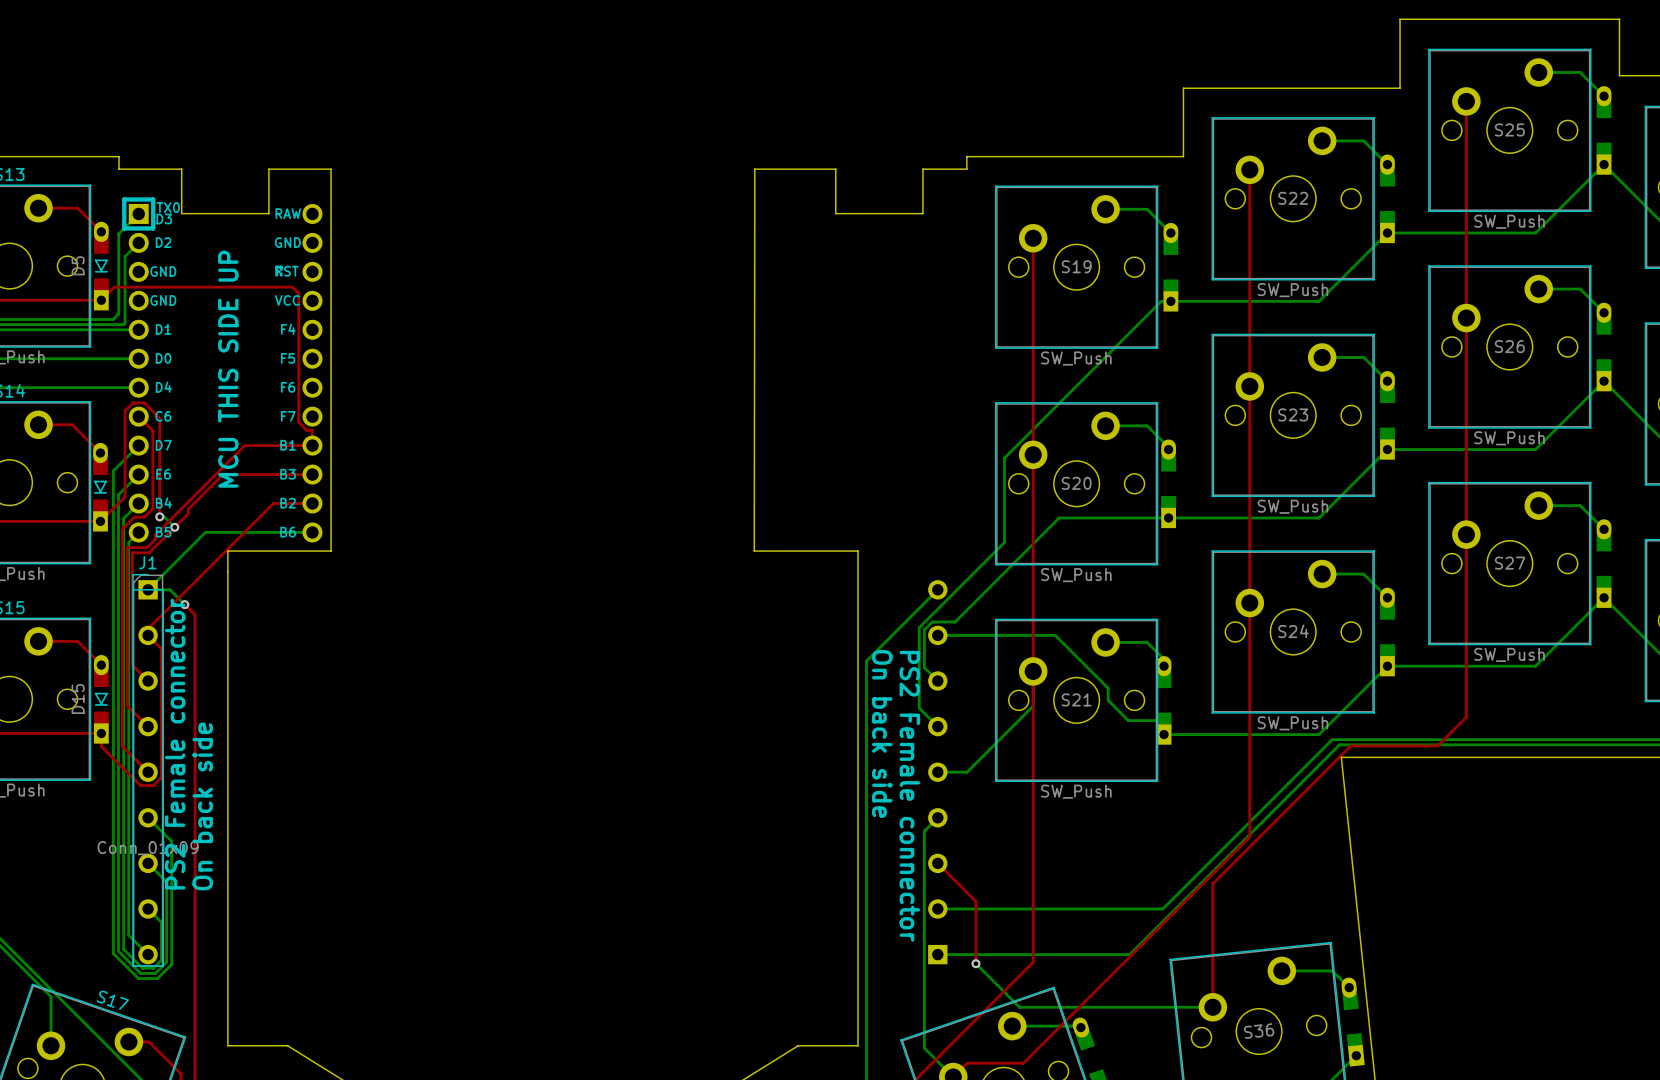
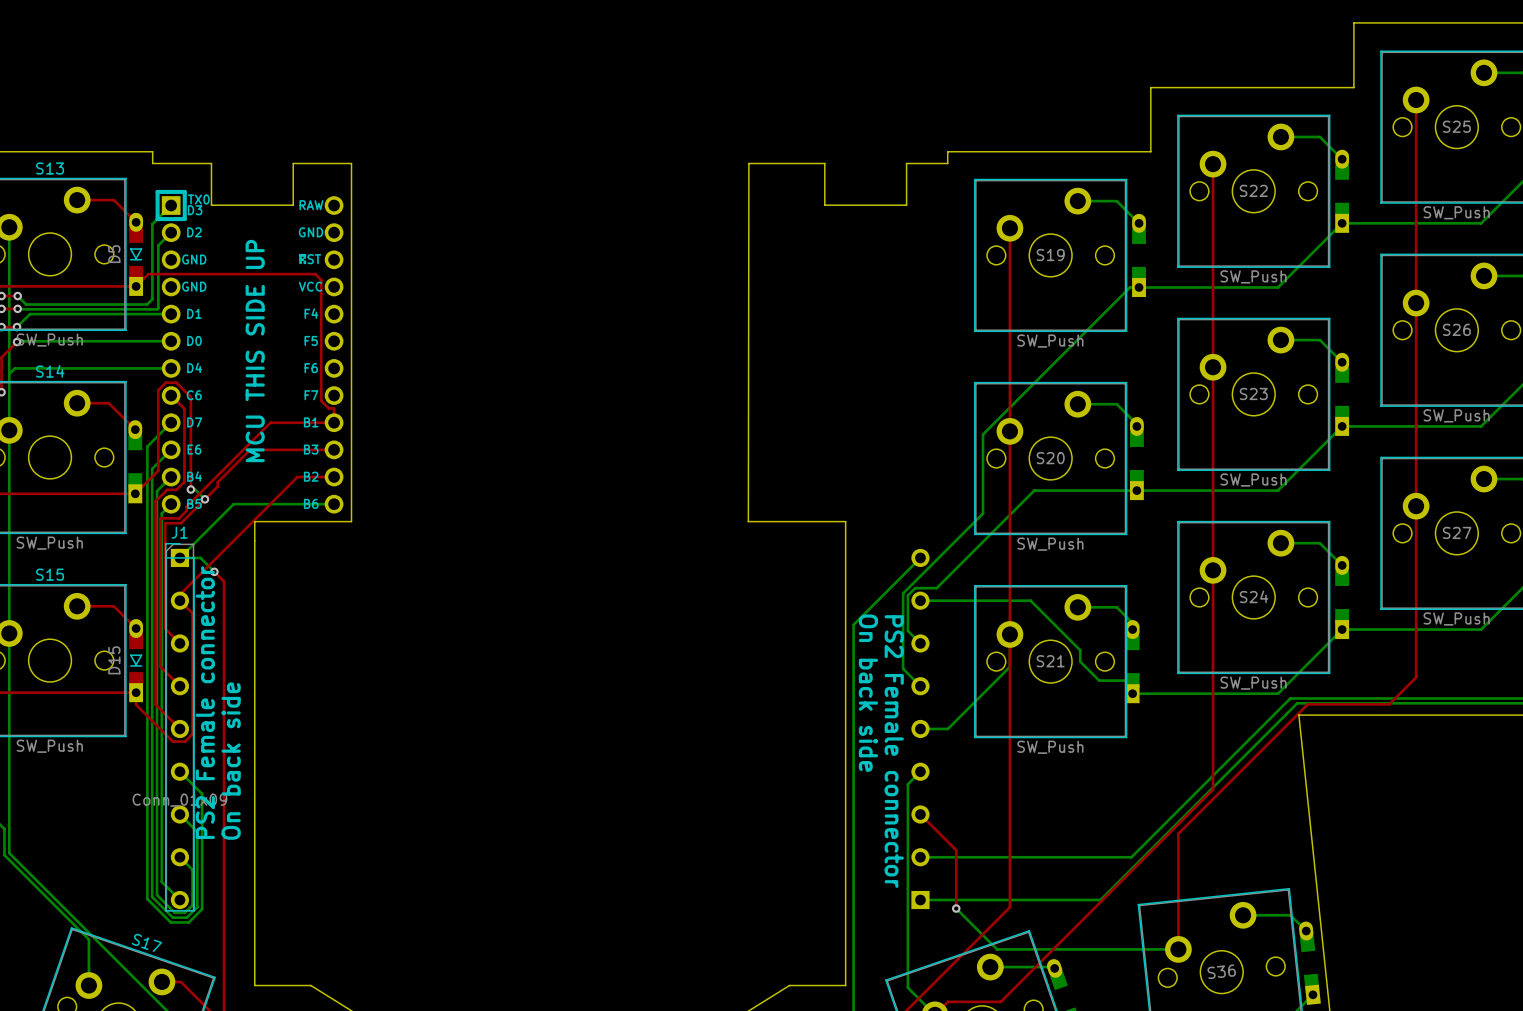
part side: top (100, 487) -> bottom (135, 461)

